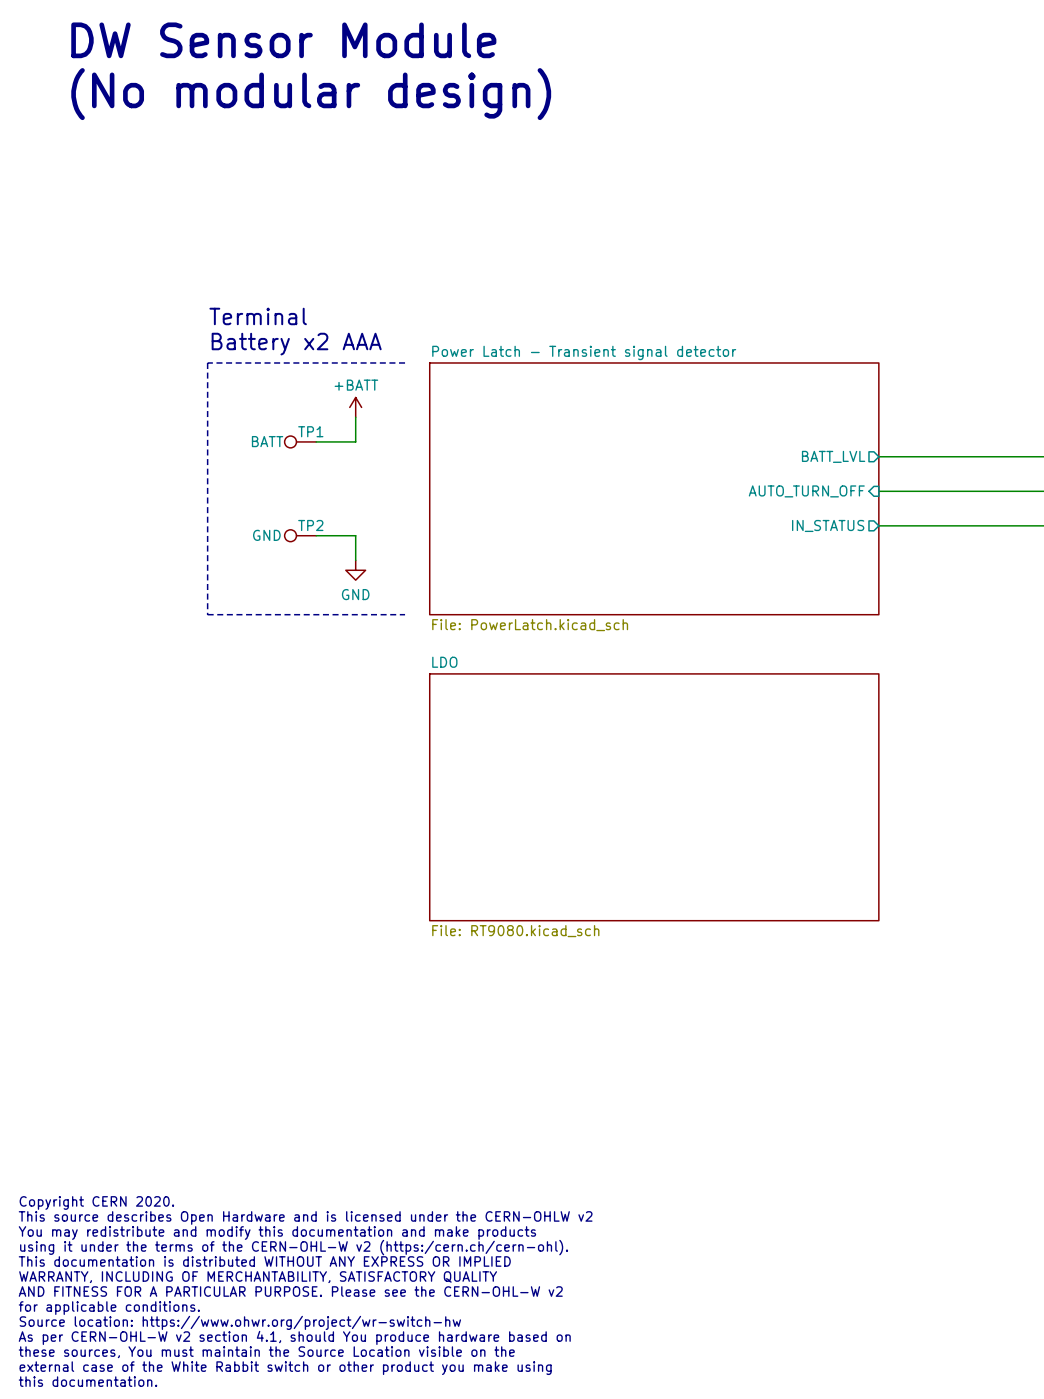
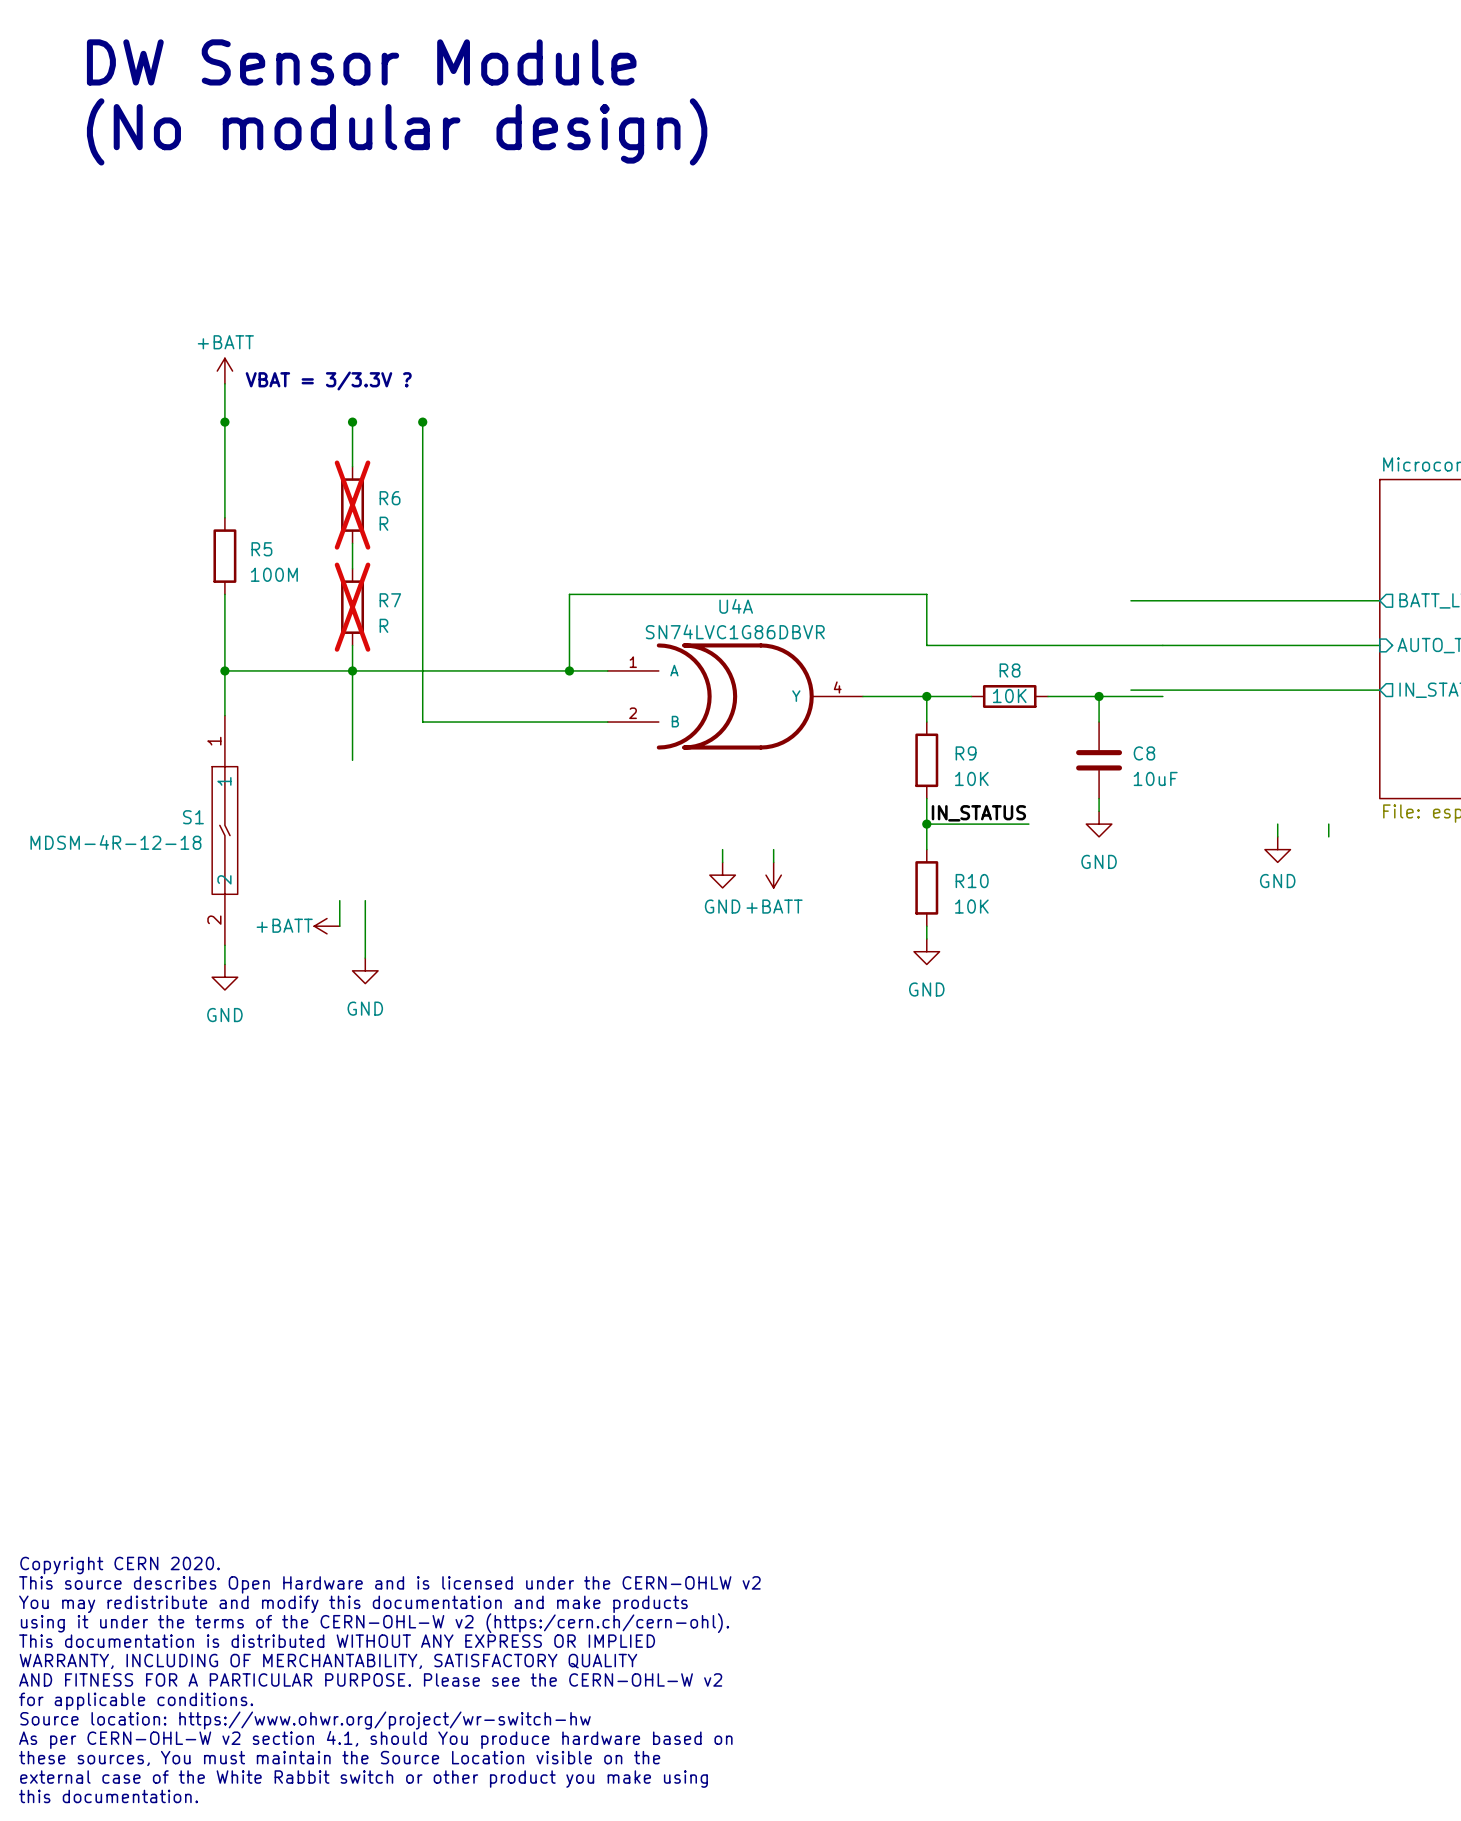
power symbol: none -> +BATT (224, 371)
text: none -> VBAT = 3/3.3V ? (328, 380)
wire: none -> (224, 383) (224, 517)
text: Terminal (258, 316) -> none
junction: none -> (224, 422)
wire: none -> (352, 422) (352, 466)
junction: none -> (352, 422)
wire: none -> (422, 422) (422, 722) (607, 722)
junction: none -> (422, 422)
text: Battery x2 AAA (296, 344) -> none
line: (405, 362) (207, 362) (207, 614) (405, 614) -> none
R6: none -> R (352, 505)
power symbol: +BATT (355, 407) -> none
wire: none -> (352, 543) (352, 568)
wire: (355, 417) (355, 441) (316, 441) -> none
R5: none -> 100M (224, 556)
TP1: BATT (300, 441) -> none
wire: none -> (224, 594) (224, 715)
sheet pin: BATT_LVL (833, 456) -> none
R7: none -> R (352, 607)
sheet Power Latch - Transient signal detector: File: PowerLatch.kicad_sch (654, 488) -> none
wire: none -> (352, 645) (352, 760)
sheet pin: AUTO_TURN_OFF (806, 491) -> none
wire: none -> (1130, 645) (926, 645) (926, 594) (569, 594) (569, 670)
wire: none -> (224, 670) (607, 670)
junction: none -> (224, 670)
junction: none -> (352, 670)
junction: none -> (569, 670)
sheet pin: IN_STATUS (828, 525) -> none
U4A: none -> SN74LVC1G86DBVR (735, 696)
wire: none -> (862, 696) (971, 696)
wire: none -> (926, 696) (926, 722)
junction: none -> (926, 696)
R8: none -> 10K (1009, 696)
wire: none -> (1048, 696) (1162, 696)
wire: none -> (1099, 696) (1099, 722)
junction: none -> (1099, 696)
TP2: GND (300, 535) -> none
wire: (316, 535) (355, 535) (355, 560) -> none
power symbol: GND (355, 570) -> none
R9: none -> 10K (926, 760)
C8: none -> 10uF (1099, 760)
wire: none -> (926, 798) (926, 849)
wire: none -> (1099, 798) (1099, 811)
label: none -> IN_STATUS (978, 813)
wire: none -> (926, 824) (1028, 824)
junction: none -> (926, 824)
power symbol: none -> GND (1099, 824)
wire: none -> (1277, 824) (1277, 836)
wire: none -> (1328, 824) (1328, 836)
S1: none -> MDSM-4R-12-18 (224, 830)
wire: none -> (722, 849) (722, 862)
wire: none -> (773, 849) (773, 862)
power symbol: none -> GND (1277, 849)
power symbol: none -> GND (722, 875)
power symbol: none -> +BATT (773, 875)
R10: none -> 10K (926, 887)
wire: none -> (339, 900) (339, 926)
wire: none -> (365, 900) (365, 958)
power symbol: none -> +BATT (327, 926)
wire: none -> (926, 926) (926, 938)
wire: none -> (224, 945) (224, 964)
power symbol: none -> GND (926, 951)
power symbol: none -> GND (365, 970)
power symbol: none -> GND (224, 977)
sheet LDO: File: RT9080.kicad_sch (654, 797) -> none

